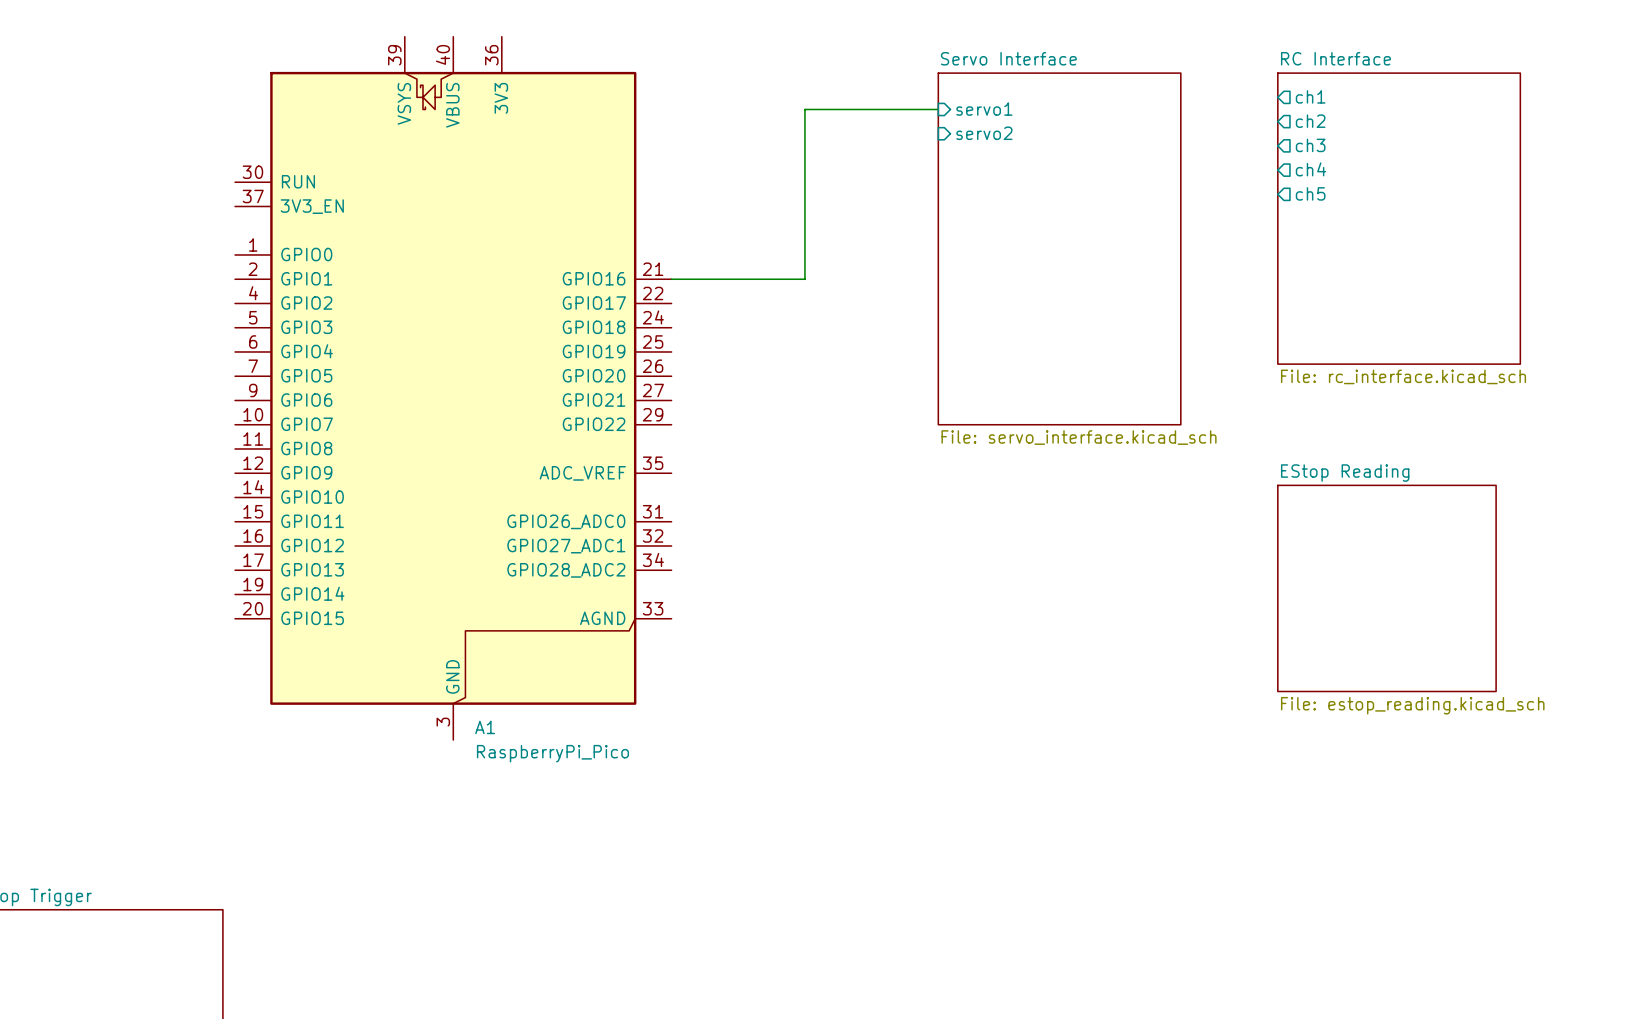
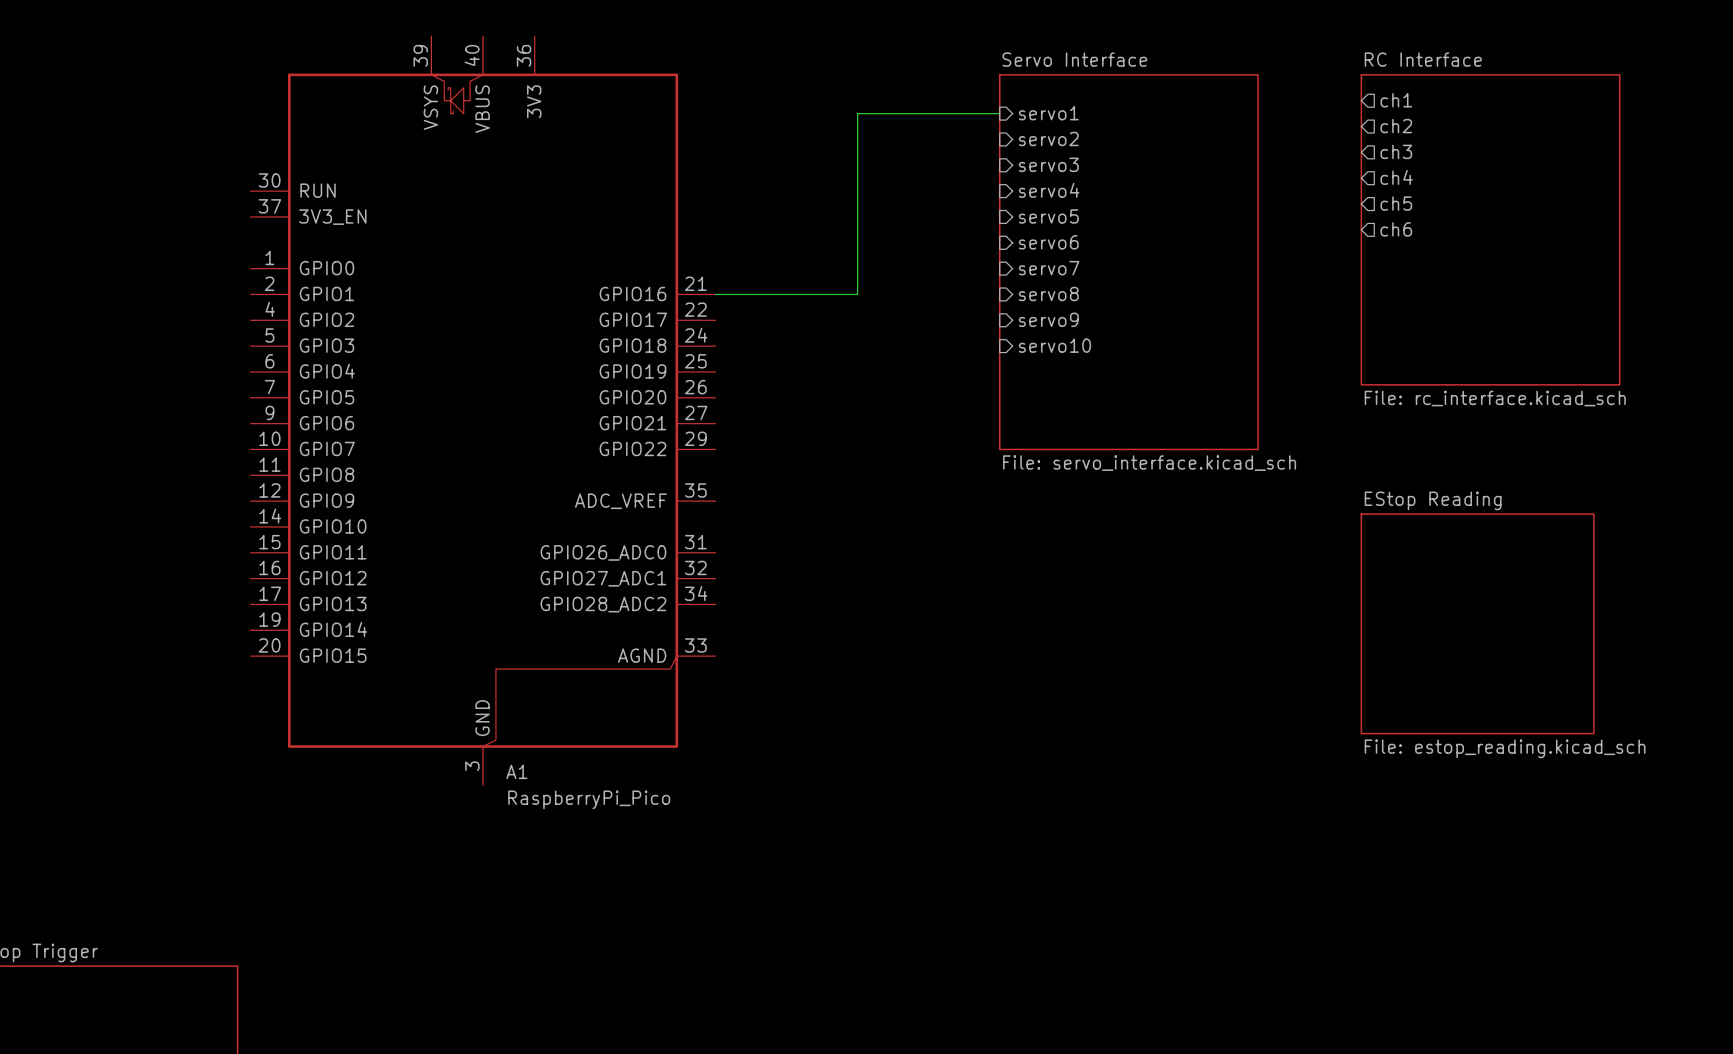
sheet pin: none -> servo3 (1048, 164)
sheet pin: none -> servo4 (1049, 190)
sheet pin: none -> servo5 (1048, 216)
sheet pin: none -> ch6 (1396, 229)
sheet pin: none -> servo6 (1048, 242)
sheet pin: none -> servo7 (1049, 268)
sheet pin: none -> servo8 (1048, 293)
sheet pin: none -> servo9 (1048, 319)
sheet pin: none -> servo10 (1054, 345)

